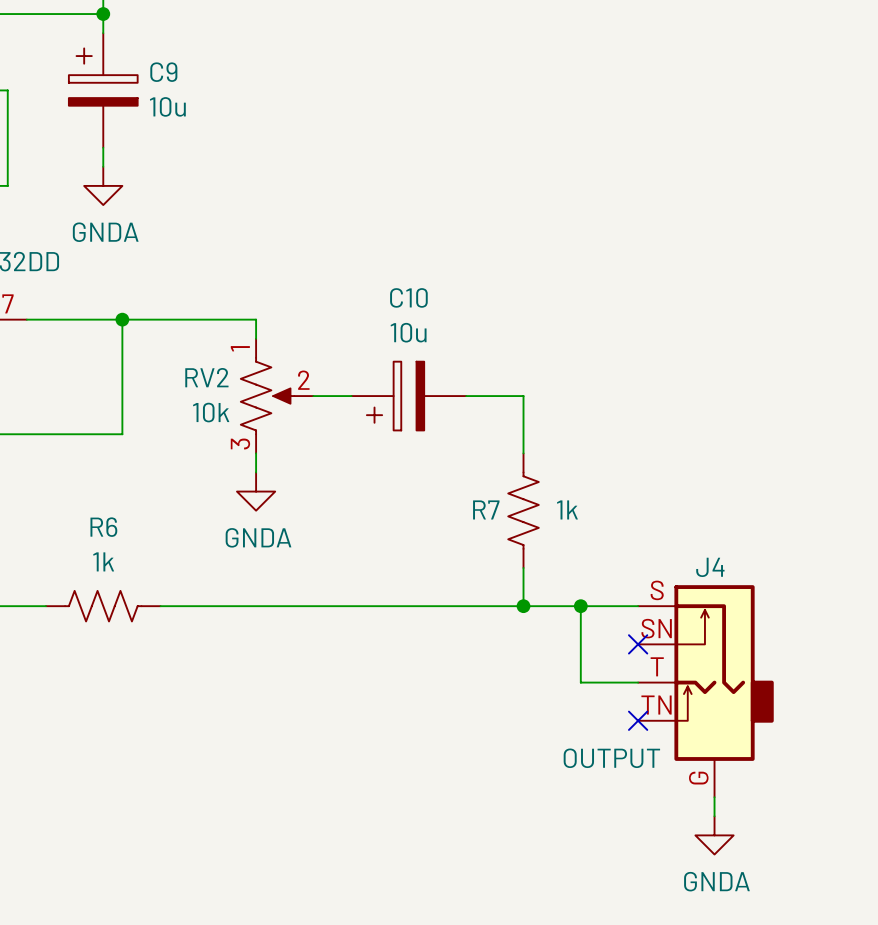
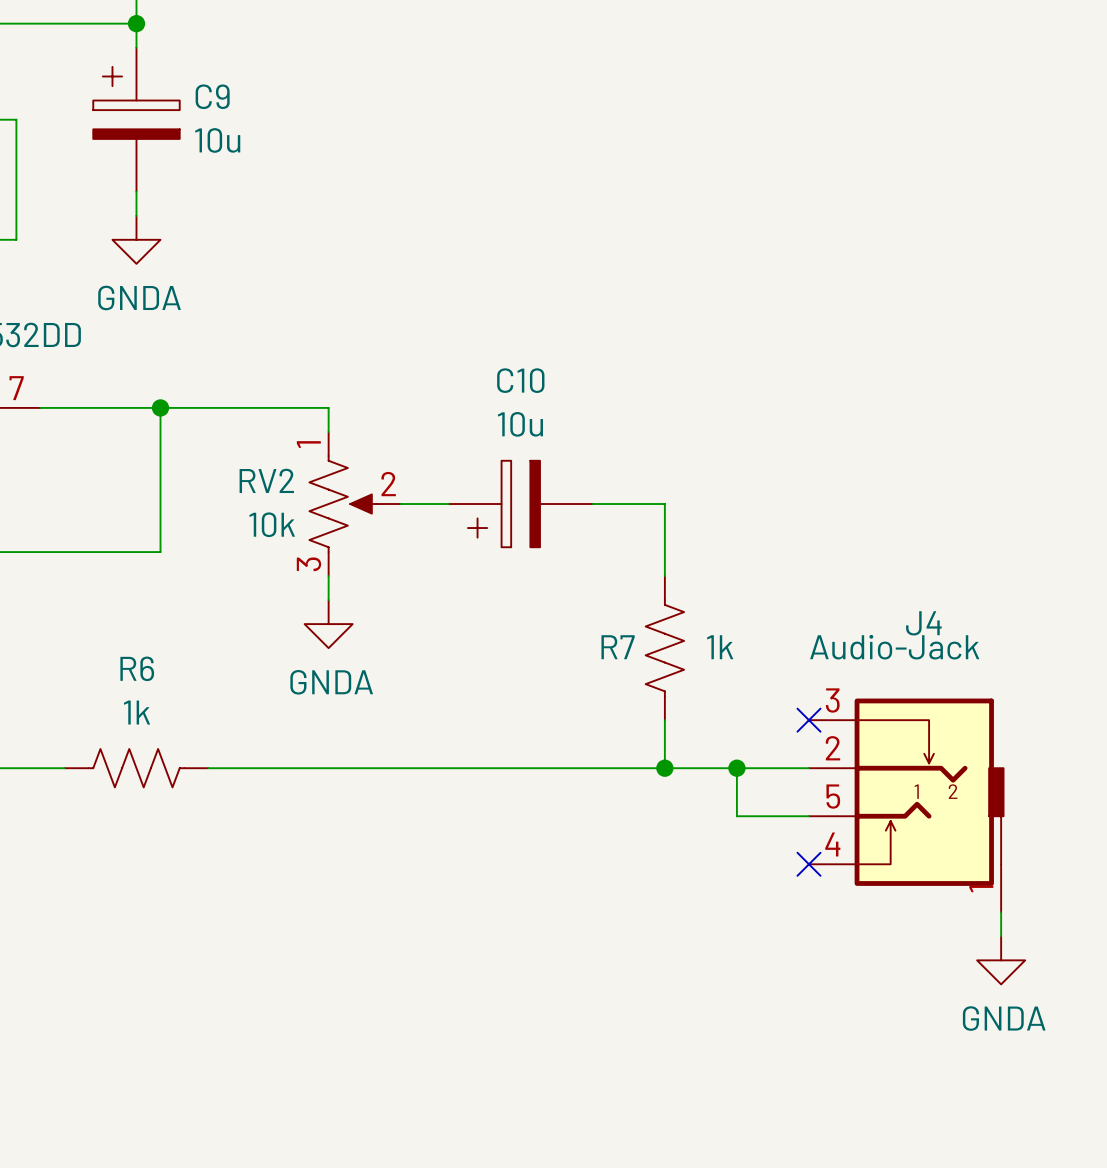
no-connect mark: none -> (808, 720)
J4 symbol: [638, 585, 774, 798] -> [808, 698, 1004, 913]
wire: (580, 644) (580, 682) (638, 682) -> (736, 816) (808, 816)
no-connect mark: (638, 644) -> none
no-connect mark: none -> (808, 864)
no-connect mark: (638, 720) -> none
J4 value: OUTPUT (611, 758) -> Audio-Jack (894, 647)
wire: (714, 797) (714, 816) -> (1001, 912) (1001, 936)
power symbol position: GNDA (714, 835) -> GNDA (1001, 960)

